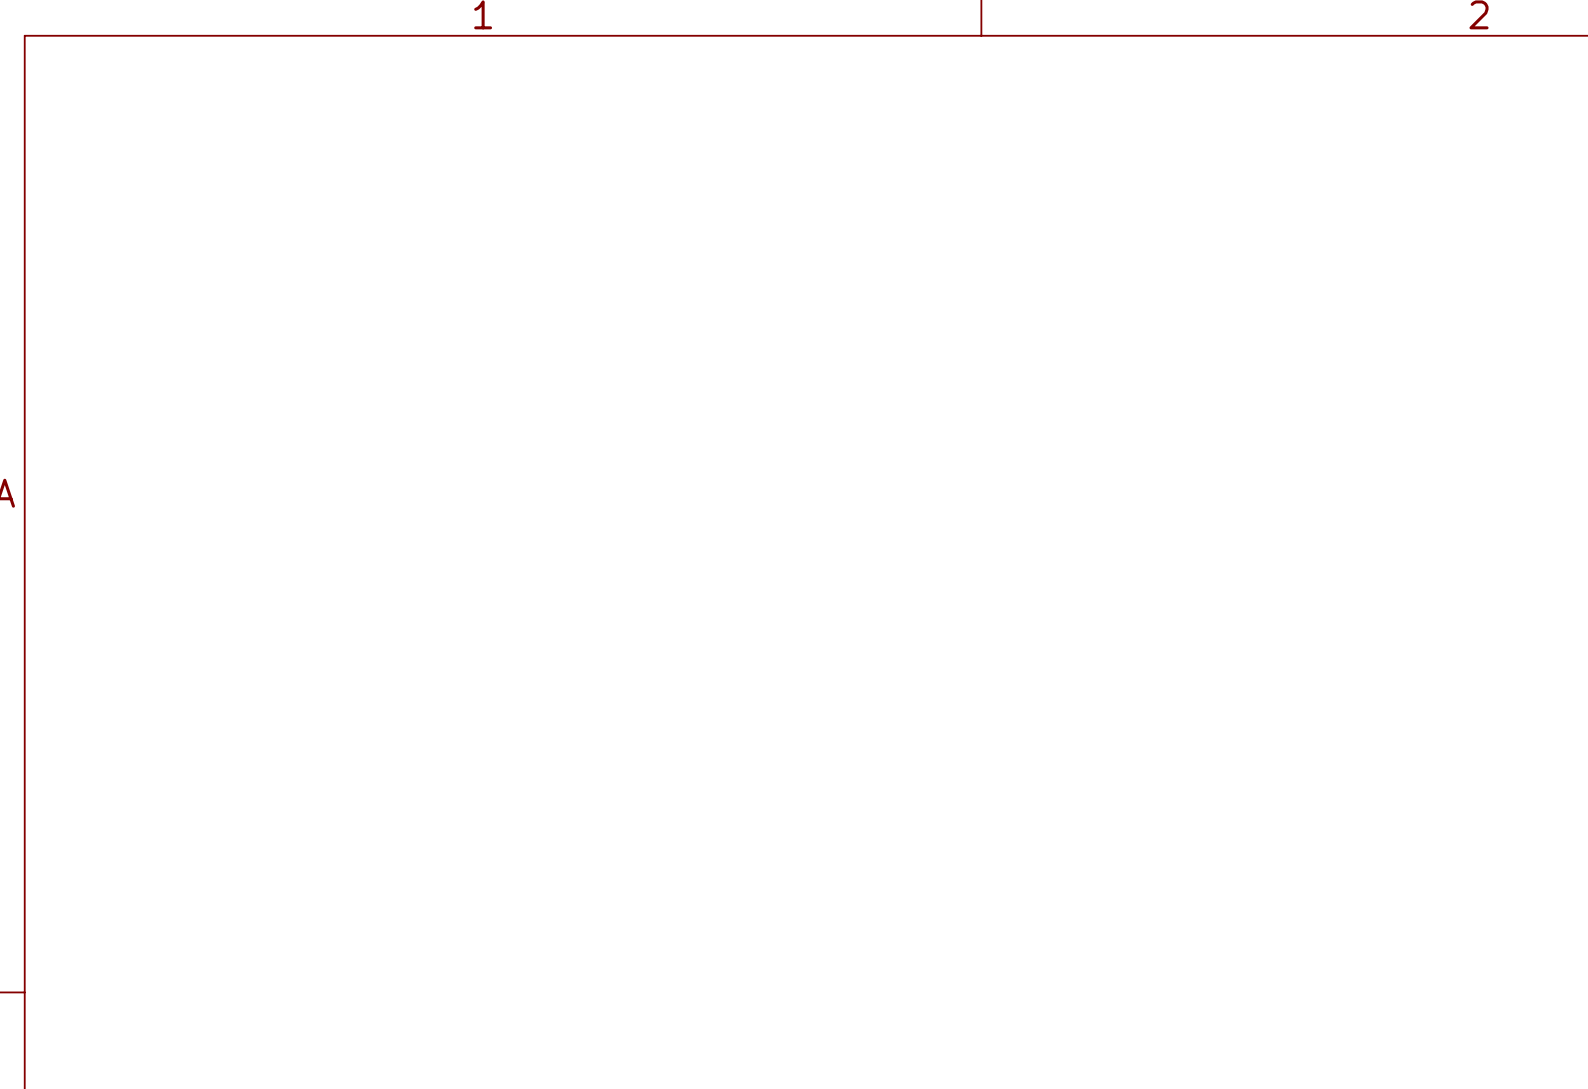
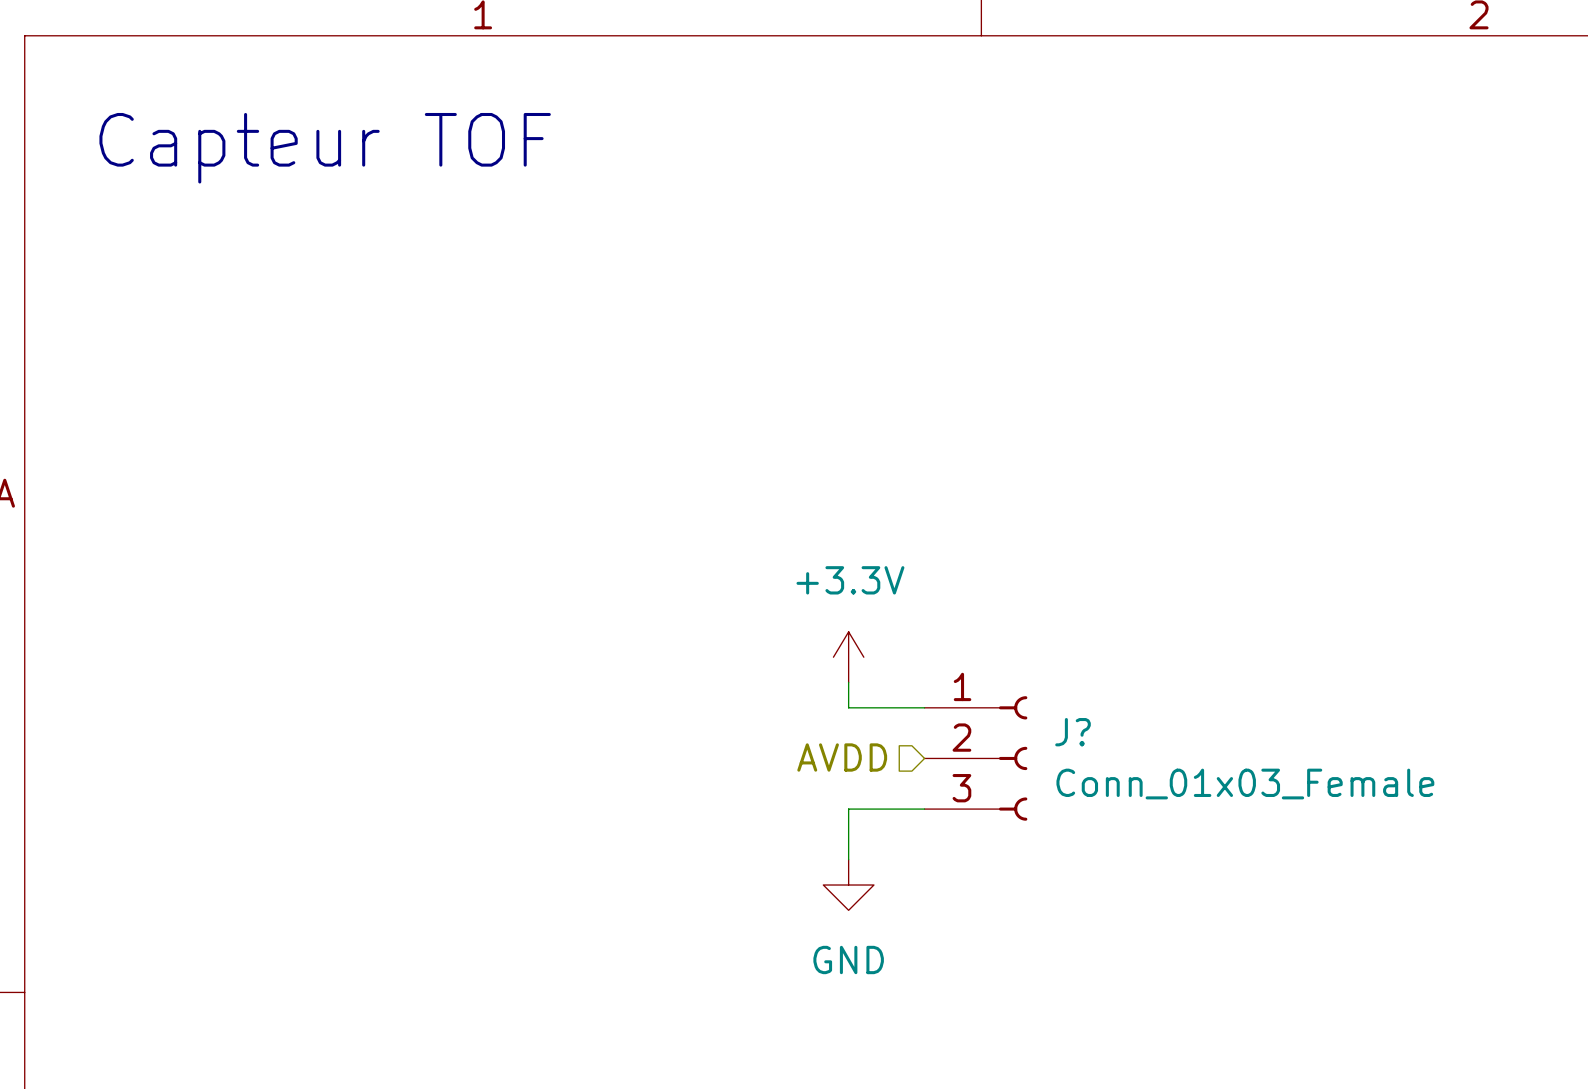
text: none -> Capteur TOF (325, 148)
power symbol: none -> +3.3V (848, 657)
wire: none -> (848, 682) (848, 707) (924, 707)
hierarchical label: none -> AVDD (842, 757)
J?: none -> Conn_01x03_Female (975, 758)
wire: none -> (924, 809) (848, 809) (848, 859)
power symbol: none -> GND (848, 885)

